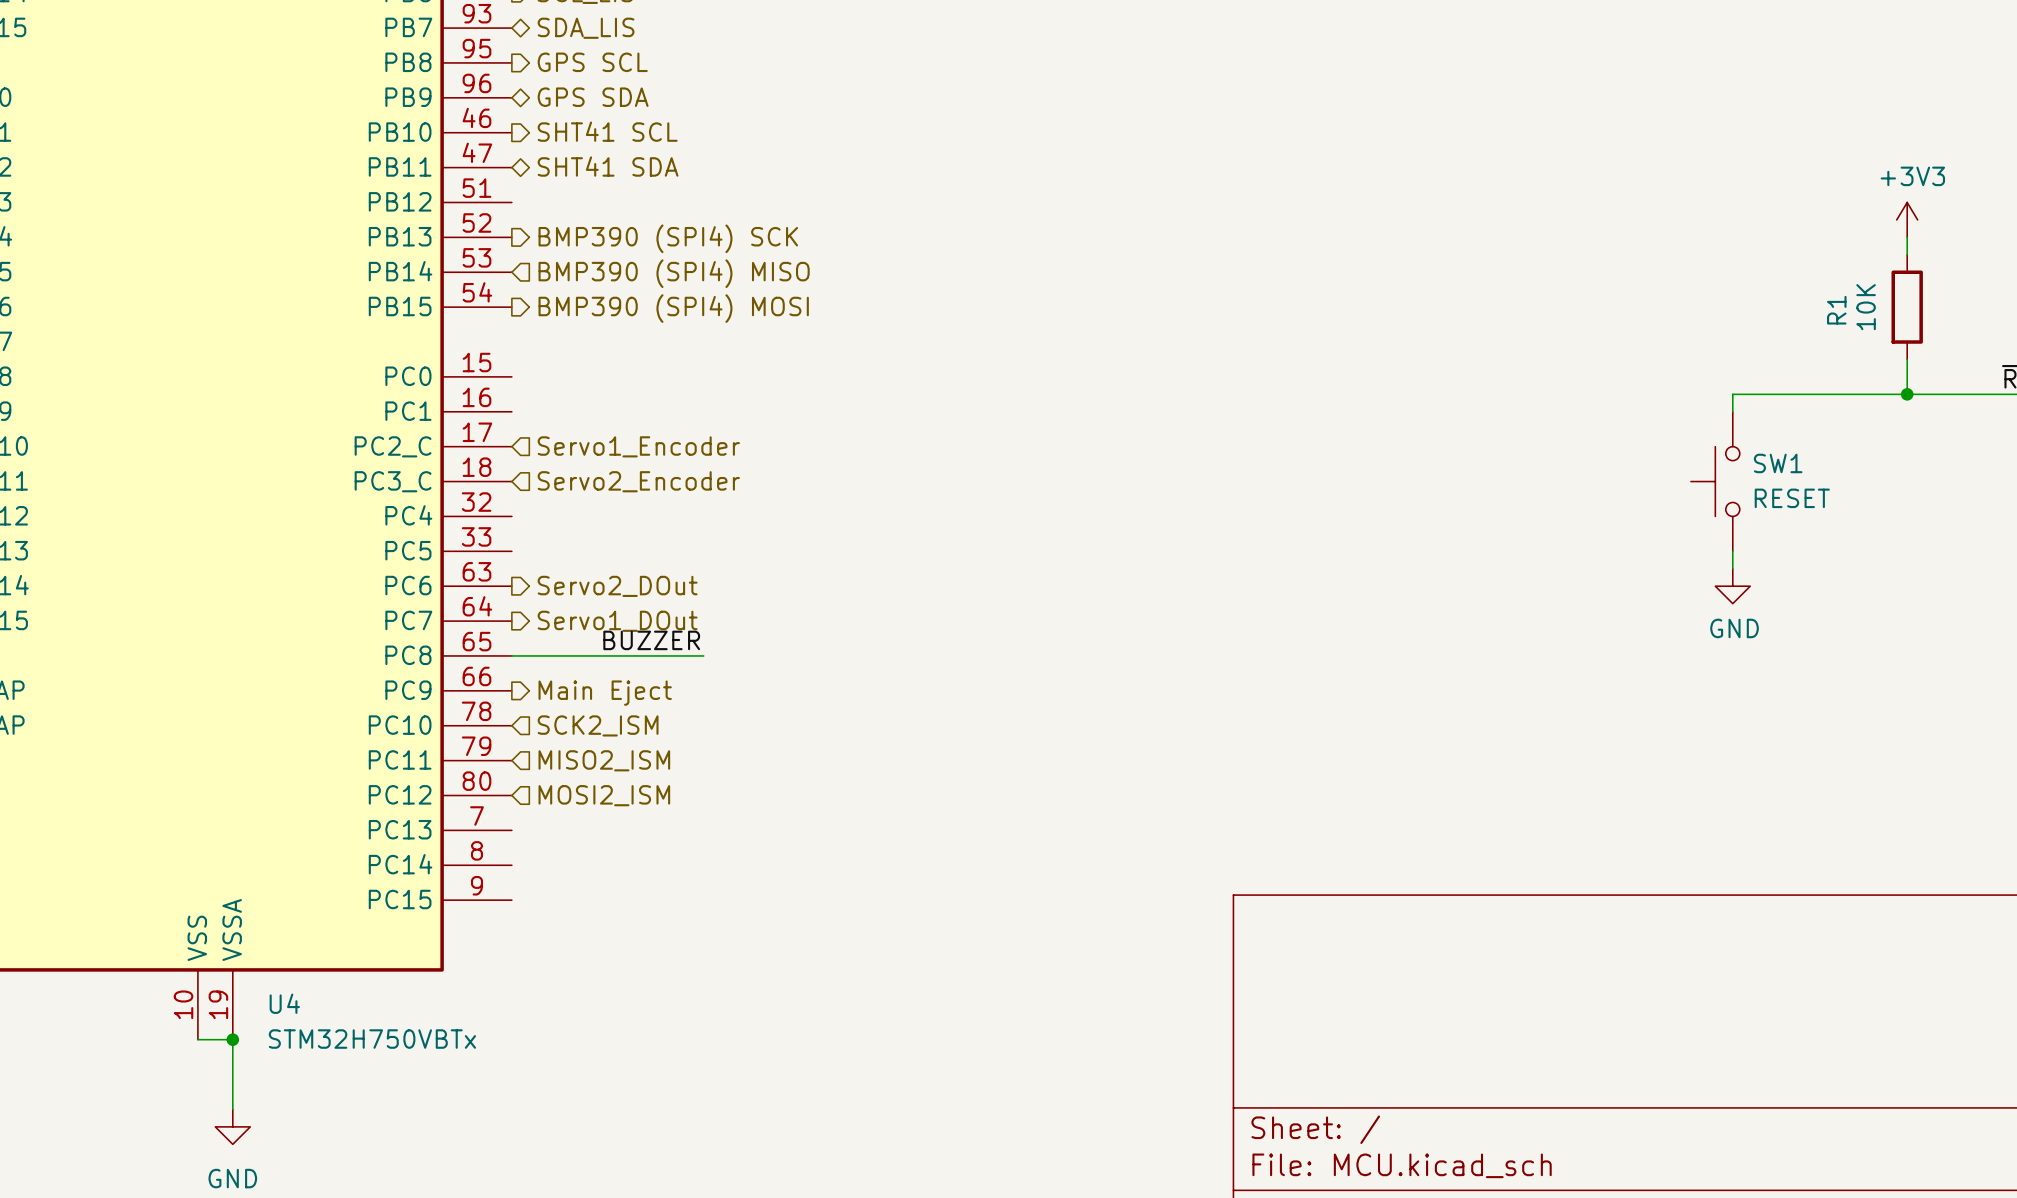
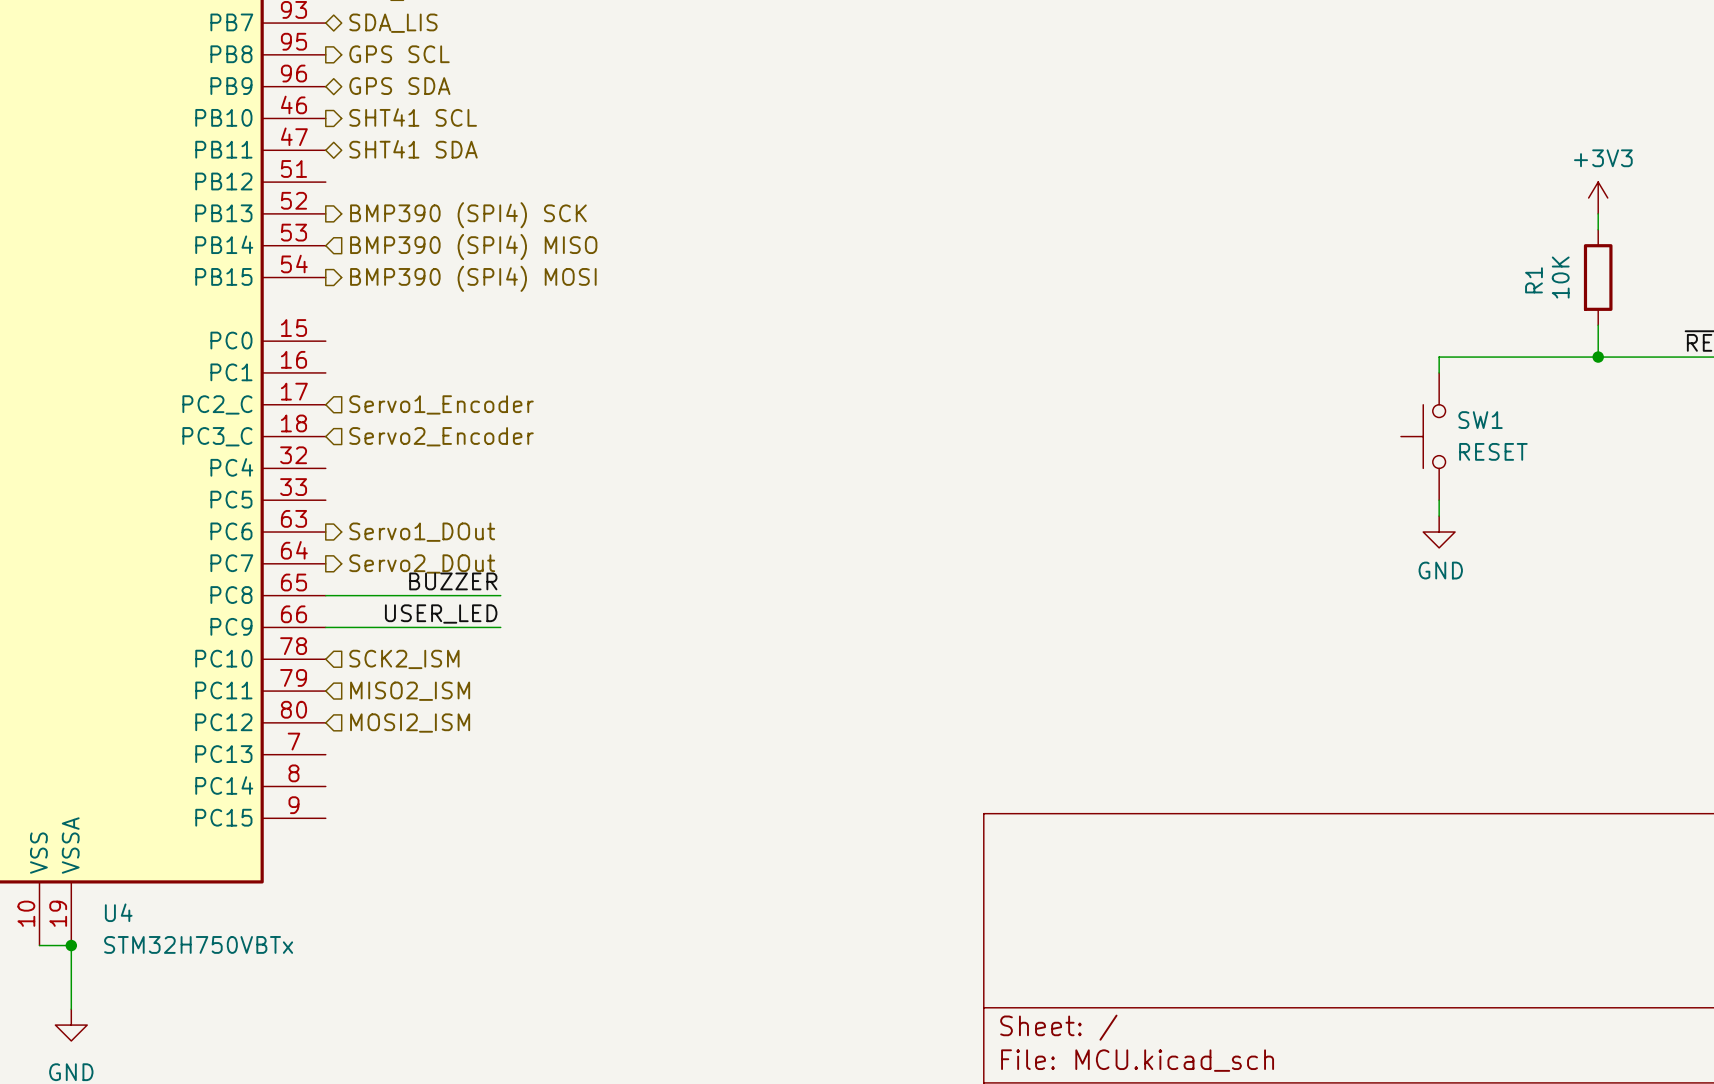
hierarchical label: Servo2_DOut (617, 586) -> Servo1_DOut (422, 532)
hierarchical label: Servo1_DOut (617, 621) -> Servo2_DOut (422, 563)
label: none -> USER_LED (441, 614)
wire: none -> (325, 627) (500, 627)
hierarchical label: Main Eject (605, 693) -> none

